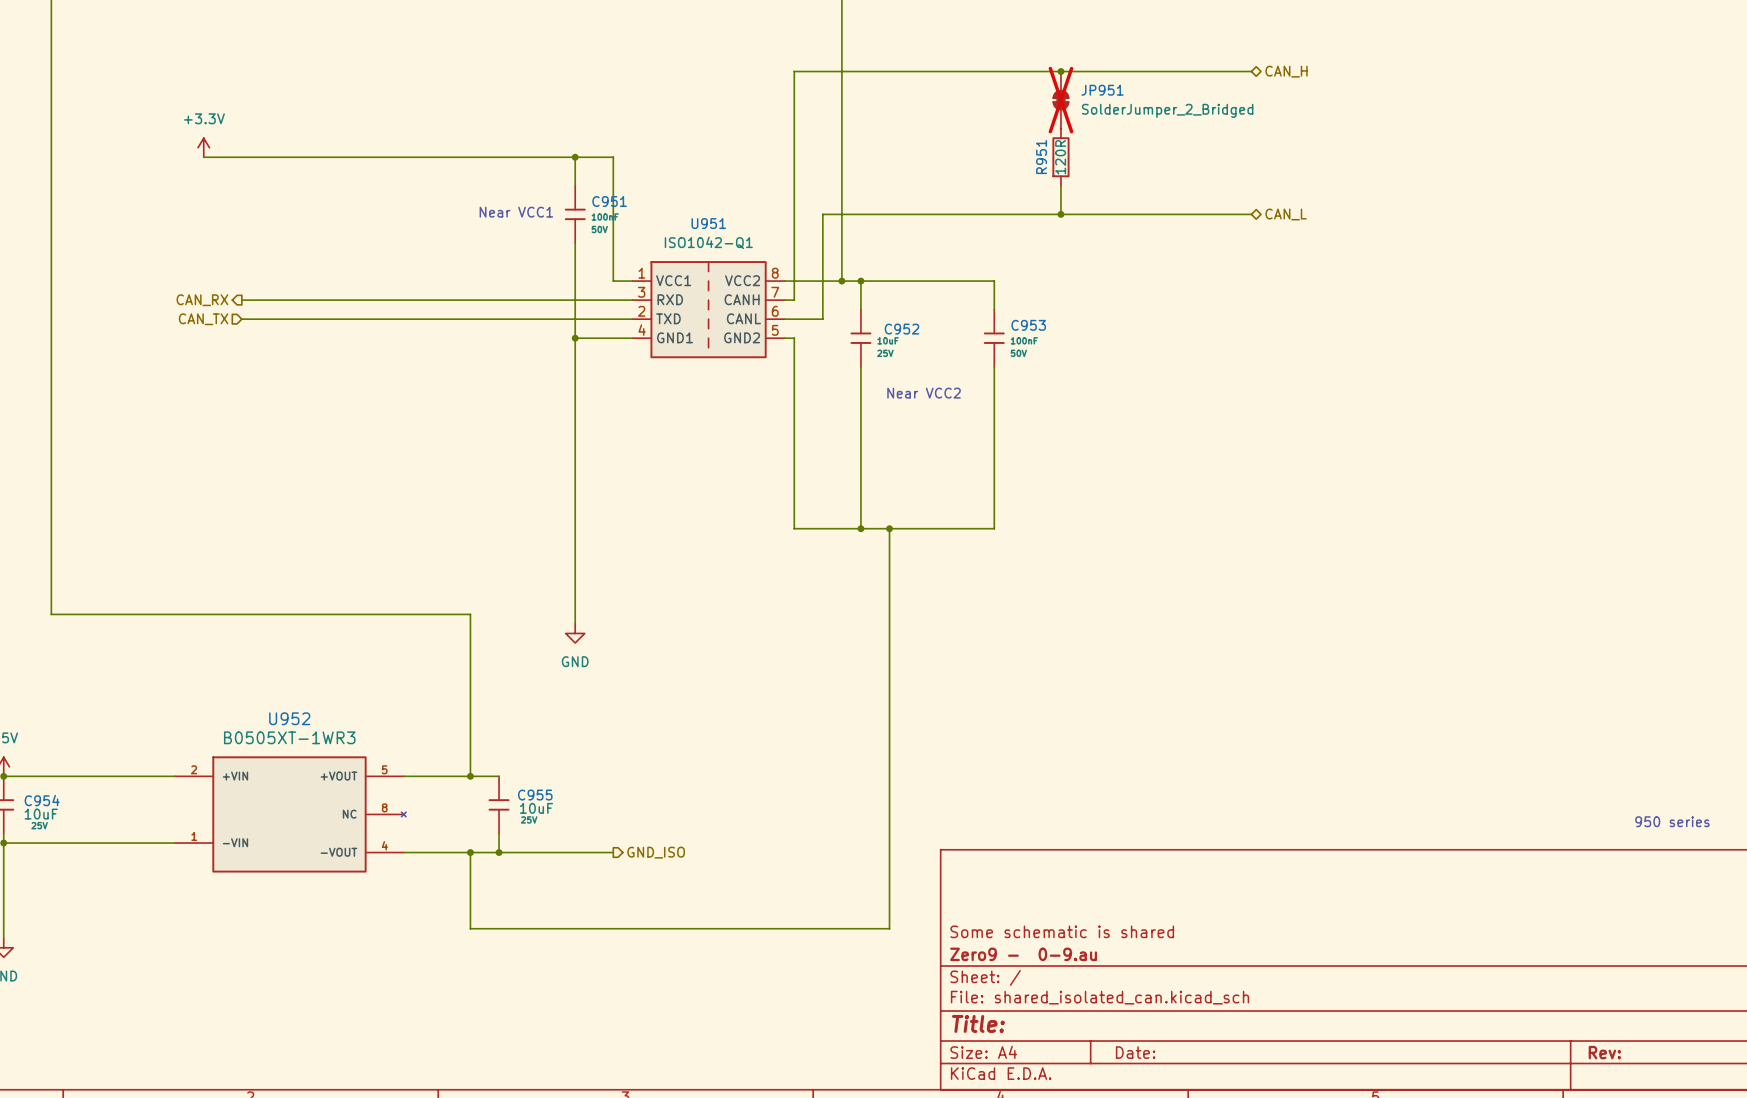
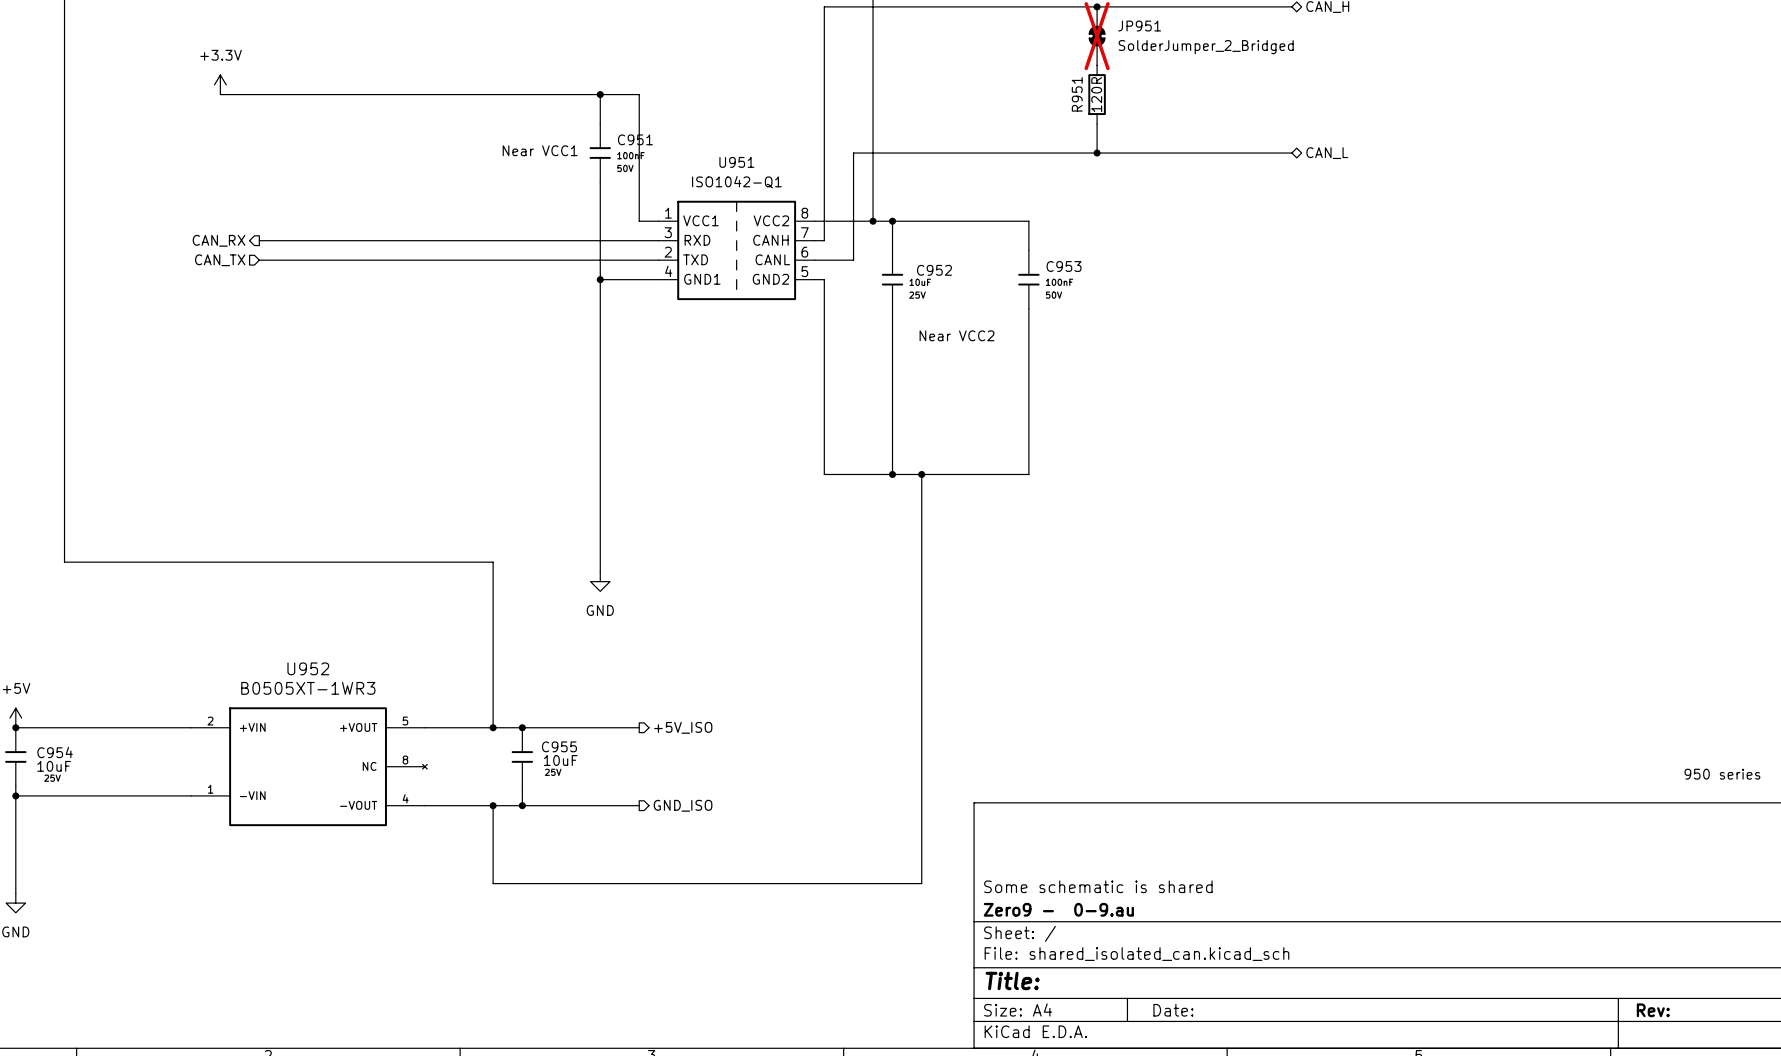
wire: none -> (522, 727) (639, 727)
junction: none -> (522, 727)
hierarchical label: none -> +5V_ISO (683, 727)

